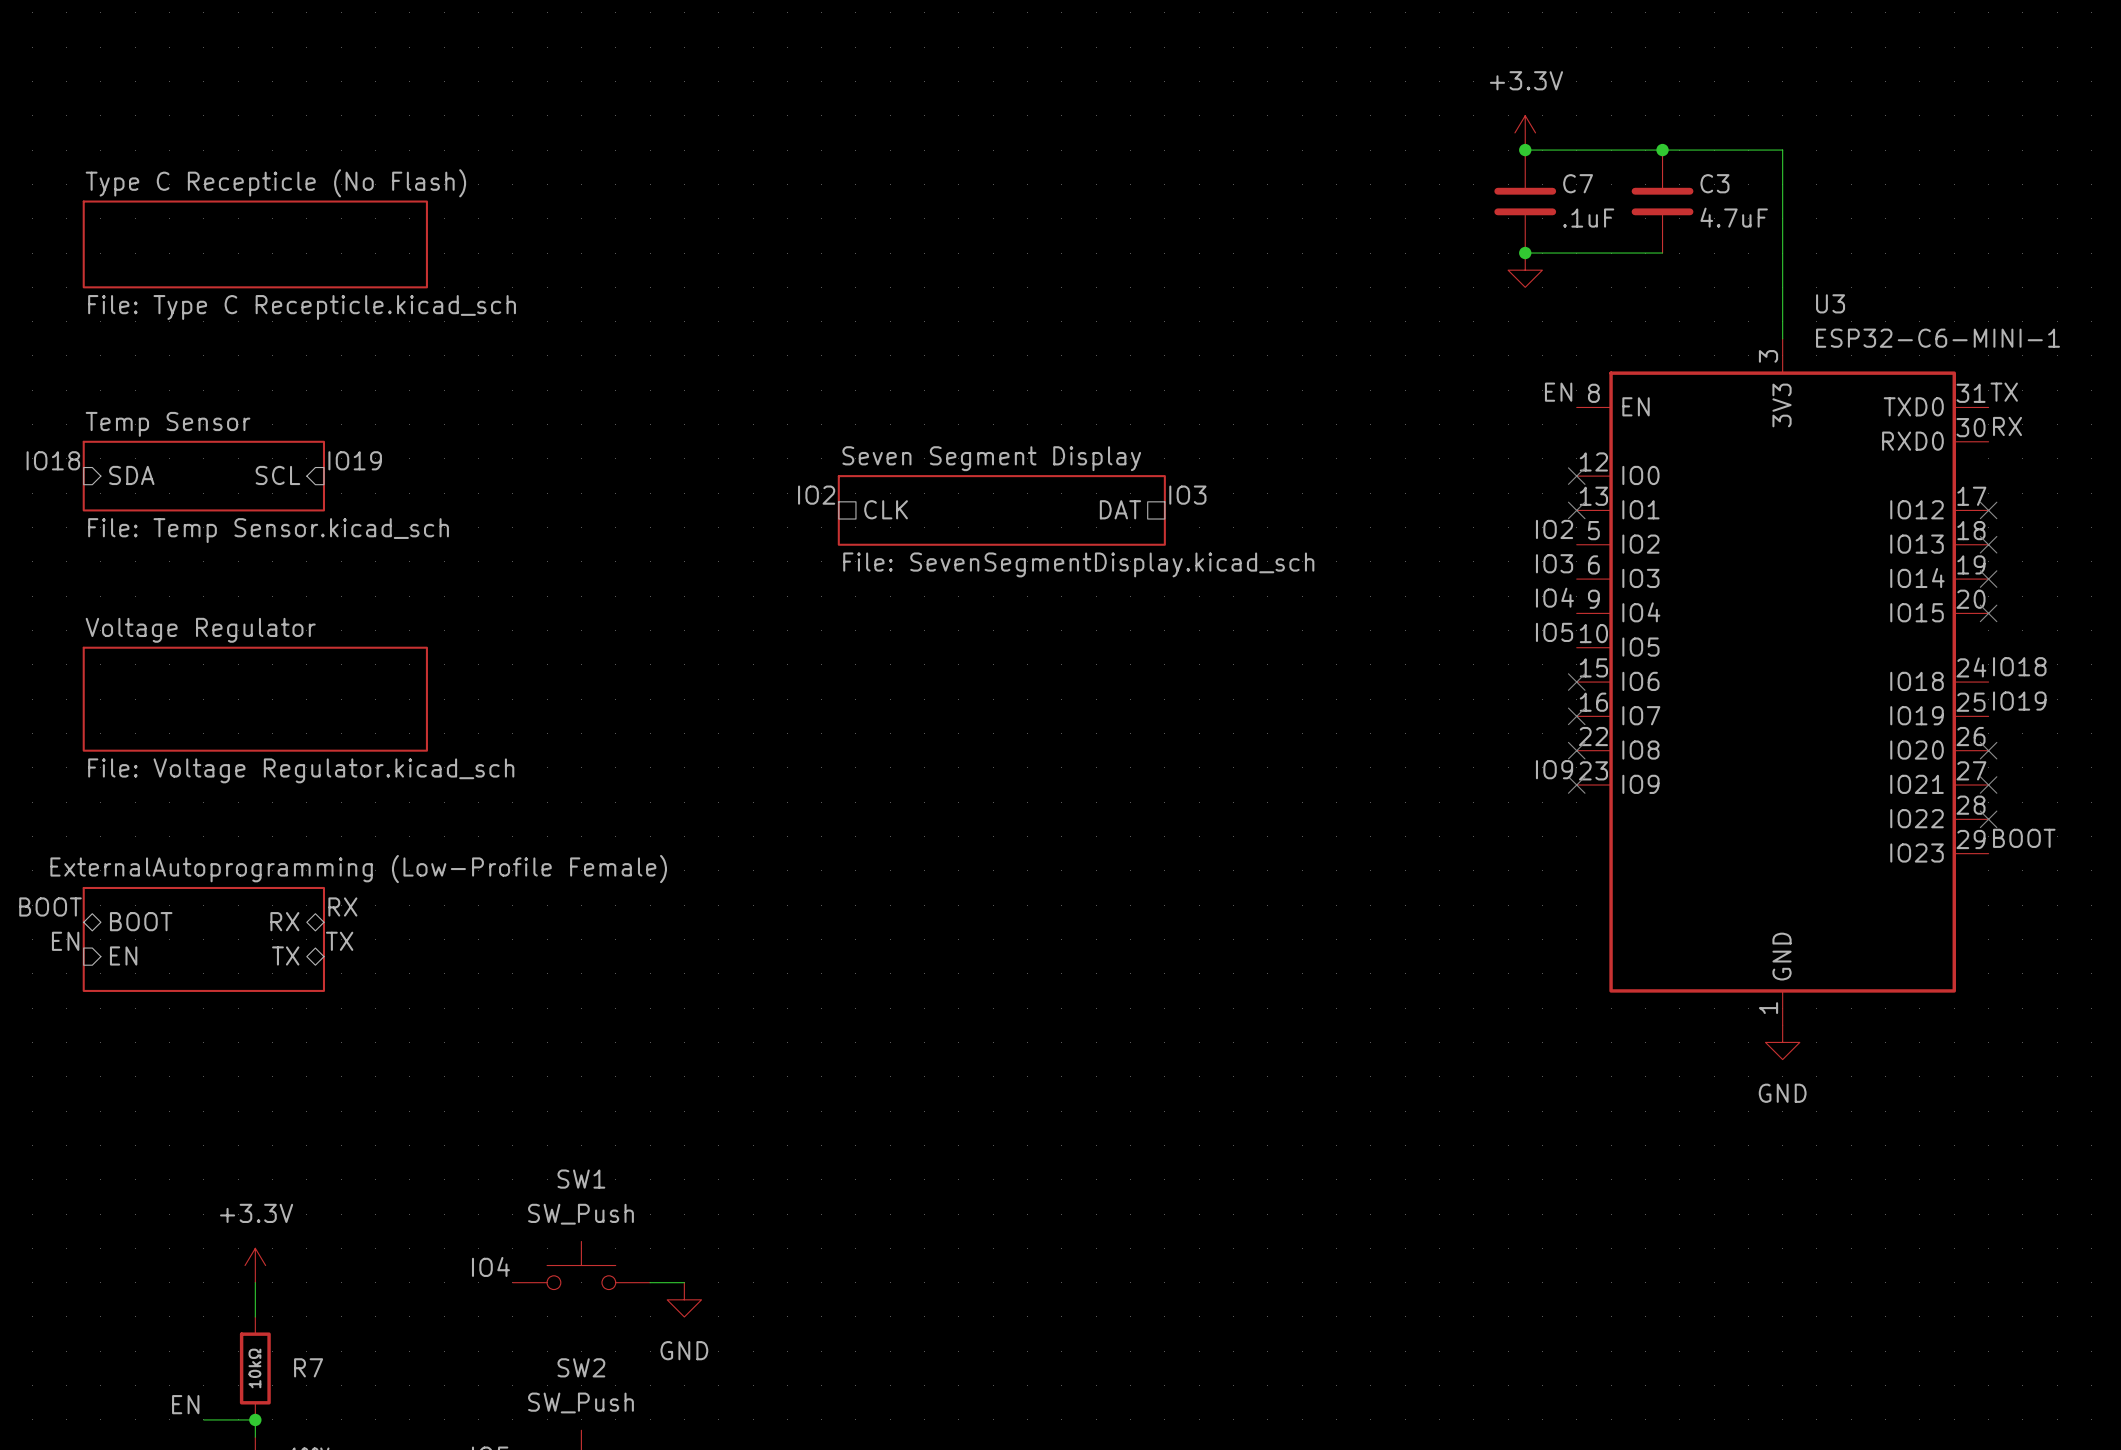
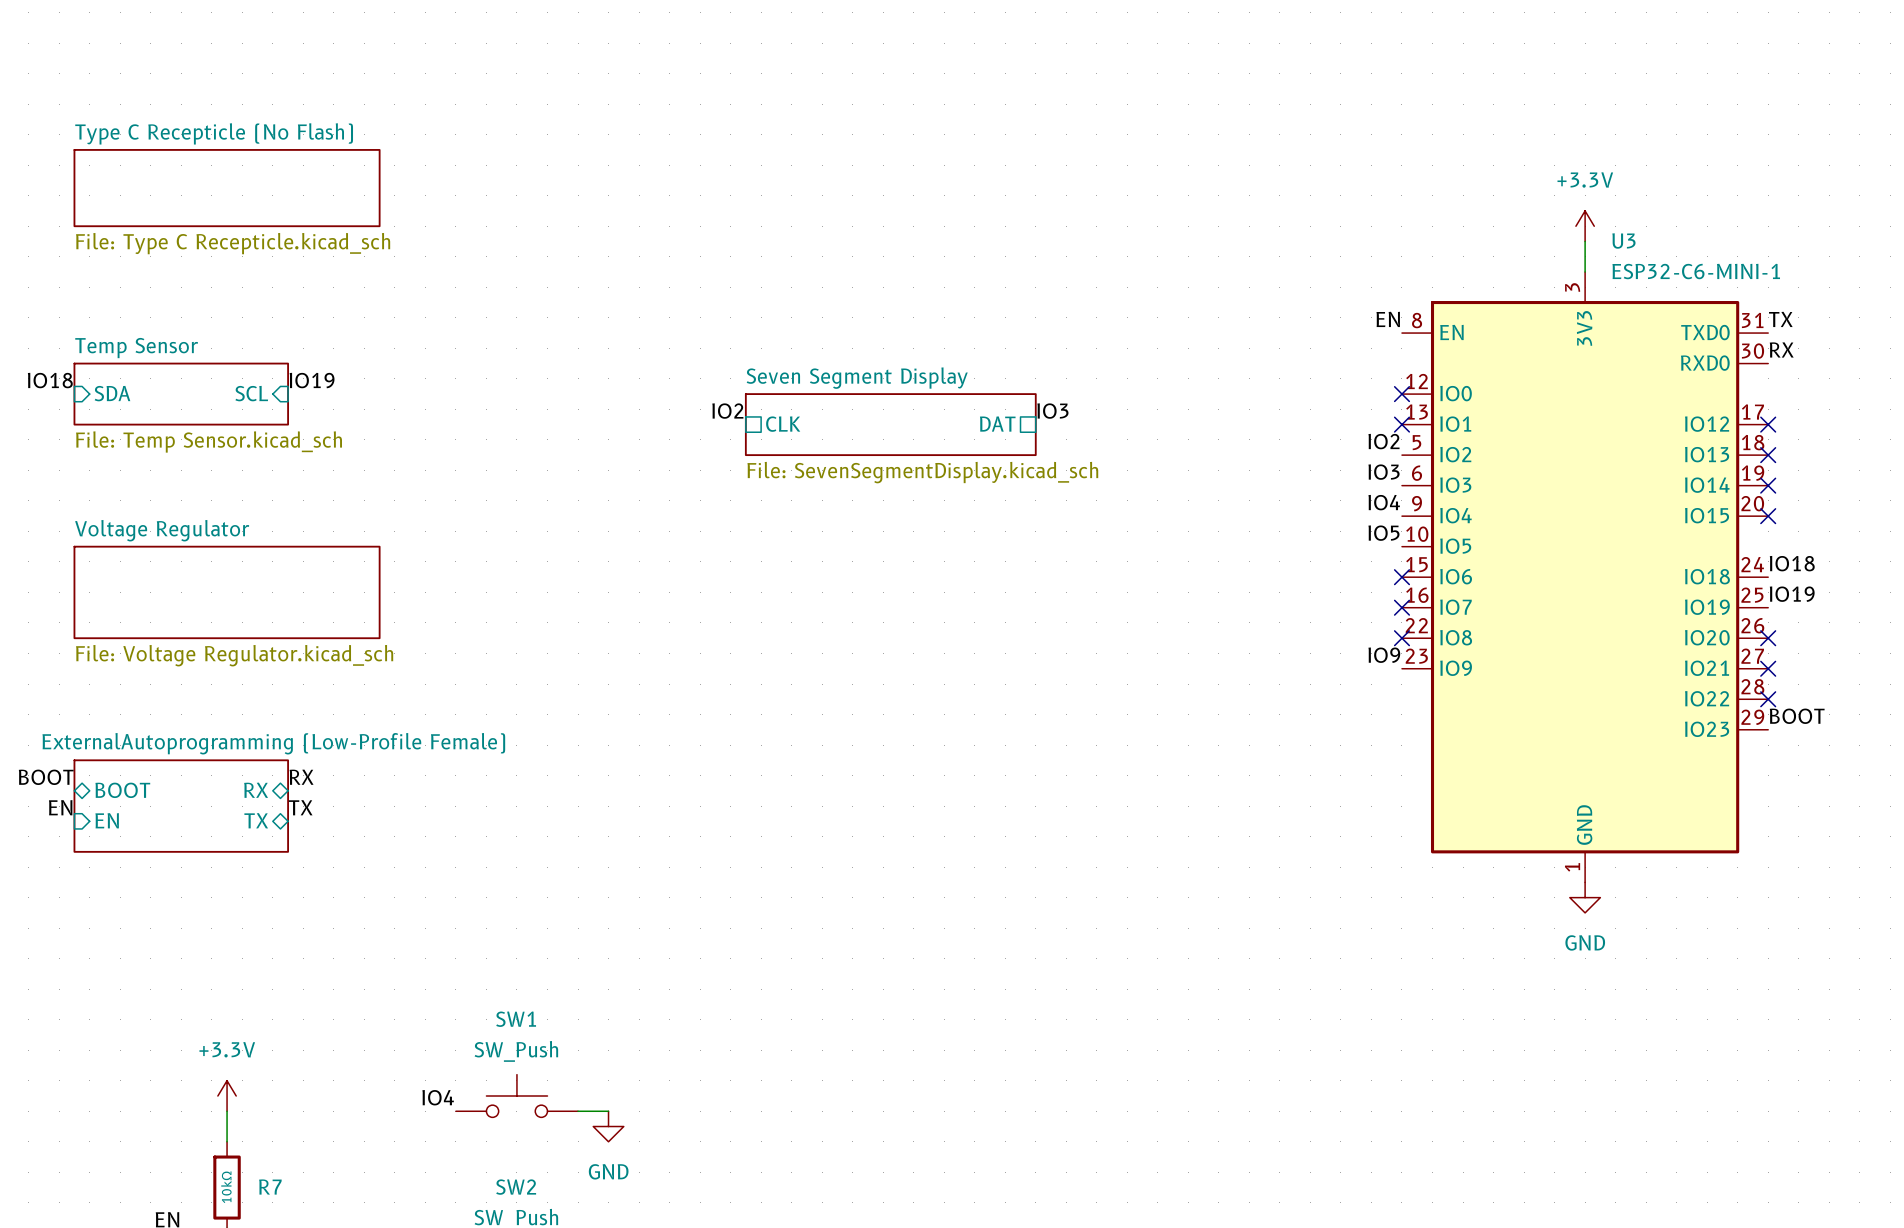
power symbol position: +3.3V (1525, 132) -> +3.3V (1585, 226)
wire: (1525, 150) (1782, 150) (1782, 304) -> none
junction: (1525, 150) -> none
junction: (1662, 150) -> none
C7: .1uF (1525, 201) -> none
C3: 4.7uF (1662, 201) -> none
wire: (1525, 253) (1662, 253) -> none
junction: (1525, 253) -> none
power symbol: (1525, 270) -> none
no-connect mark: (1576, 785) -> none

